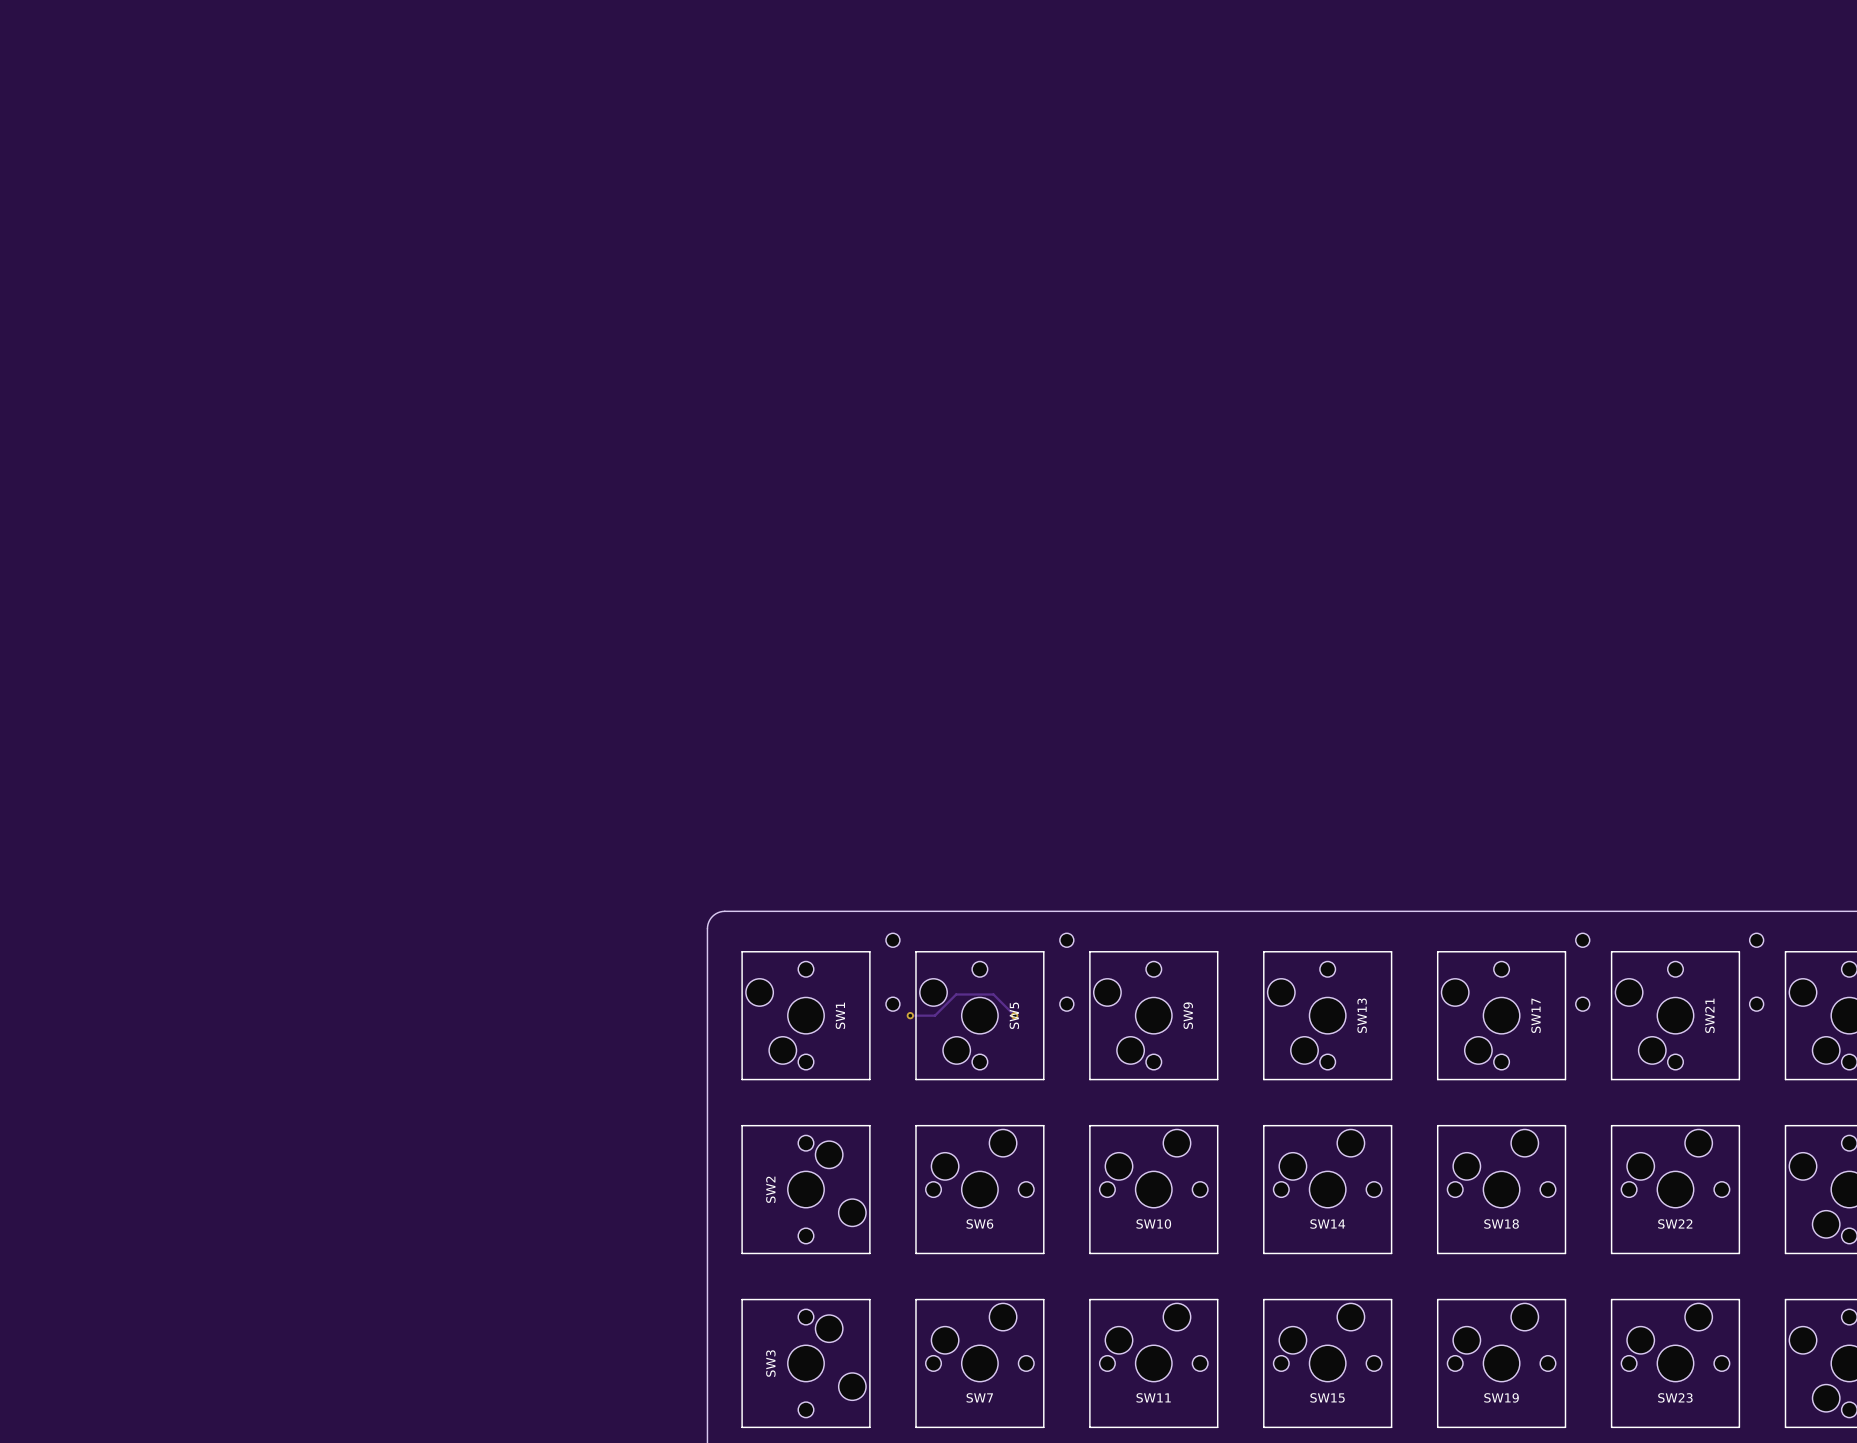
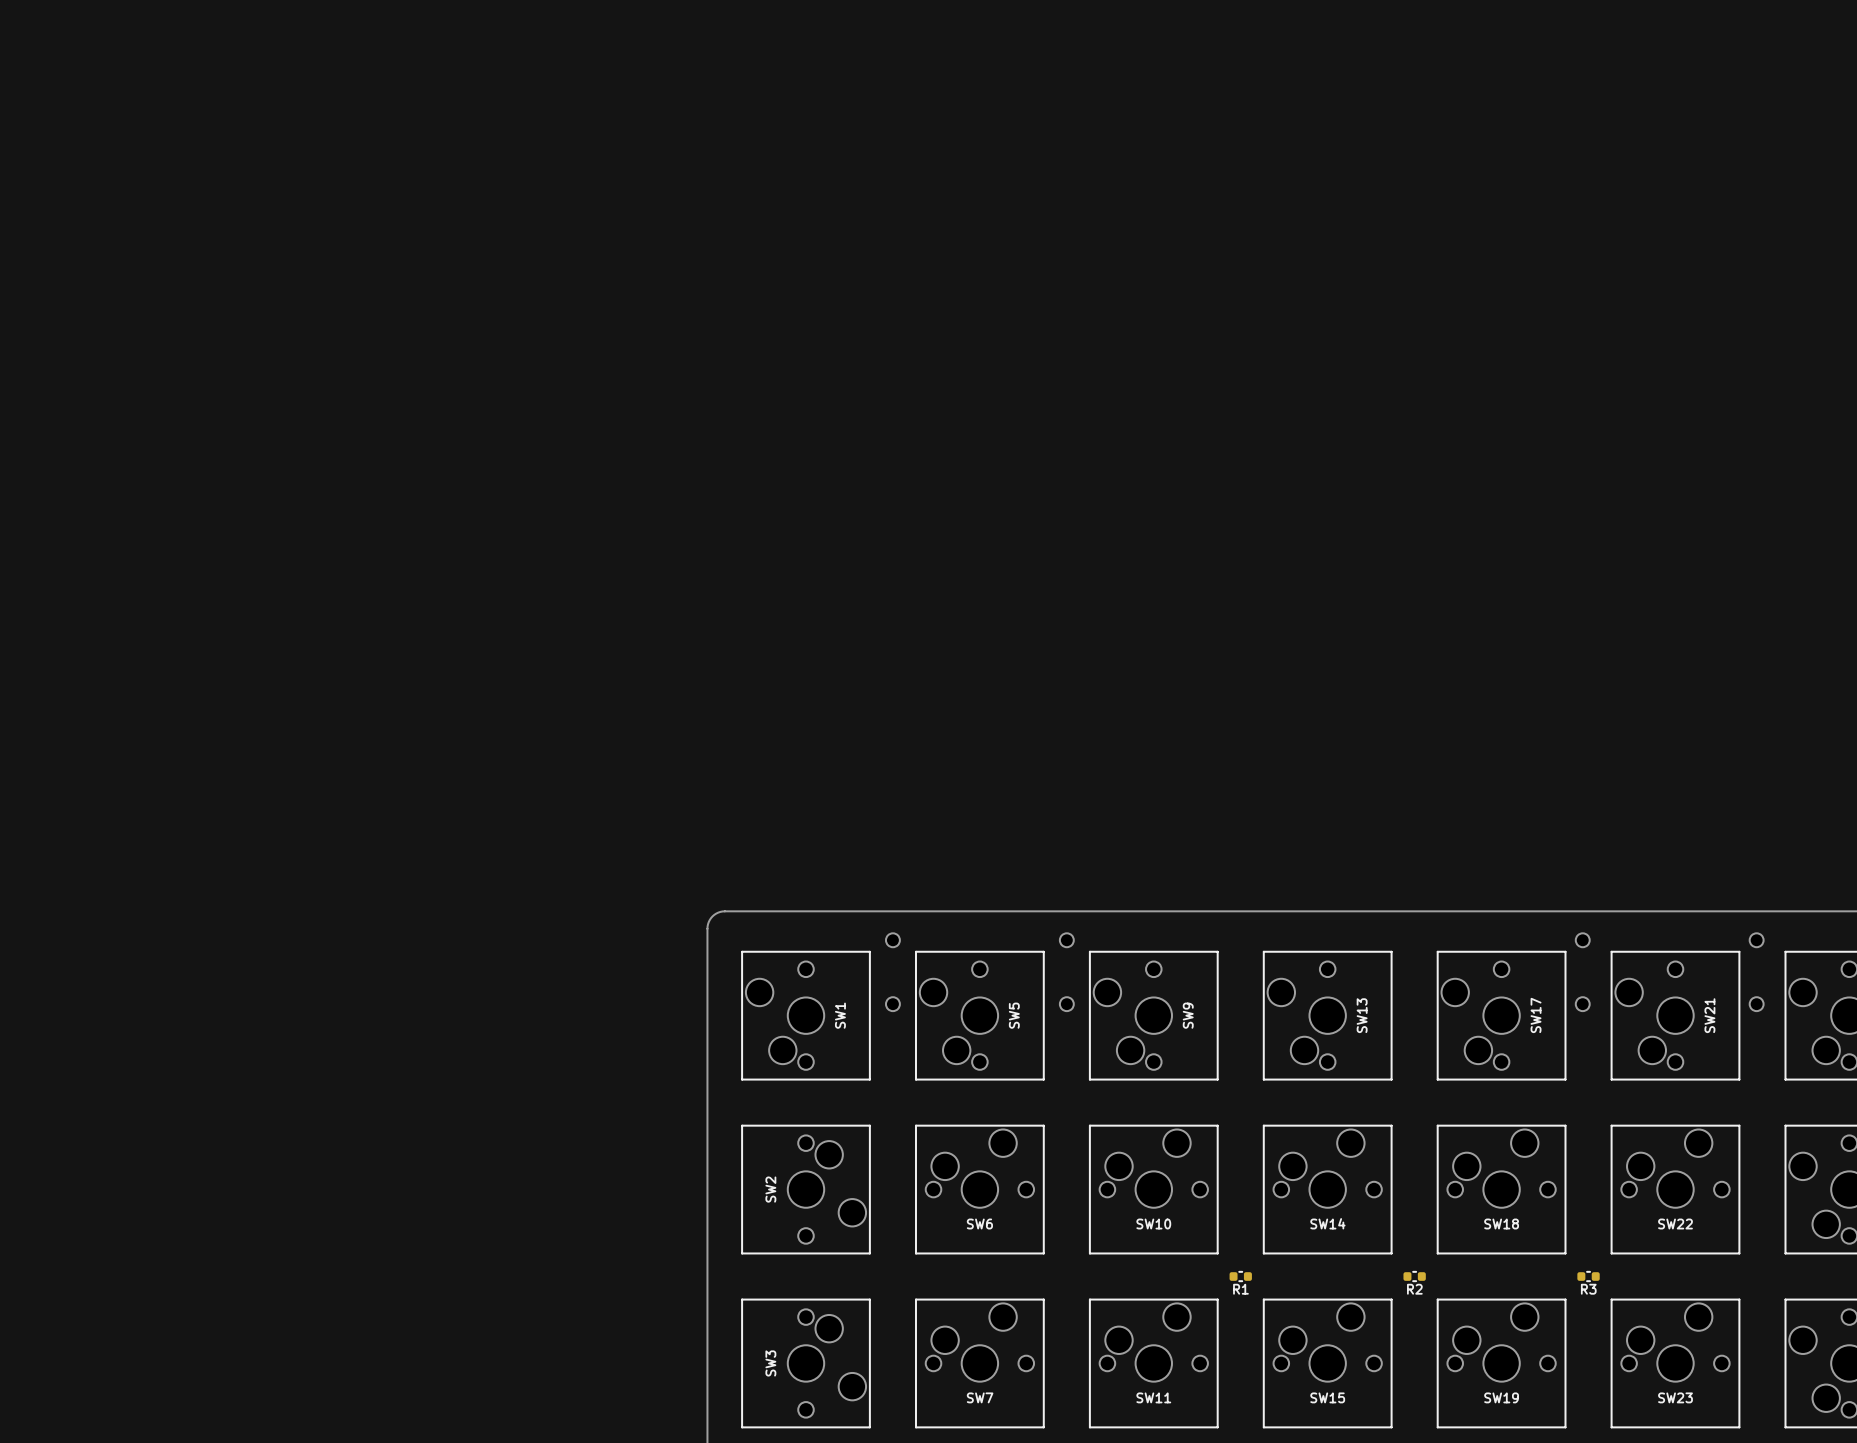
track: (910, 1015) (934, 1015) (956, 994) (993, 994) (1014, 1015) -> none
via: (910, 1015) -> none
via: (1014, 1015) -> none
R1: none -> (1240, 1276)
R2: none -> (1414, 1276)
R3: none -> (1588, 1276)

